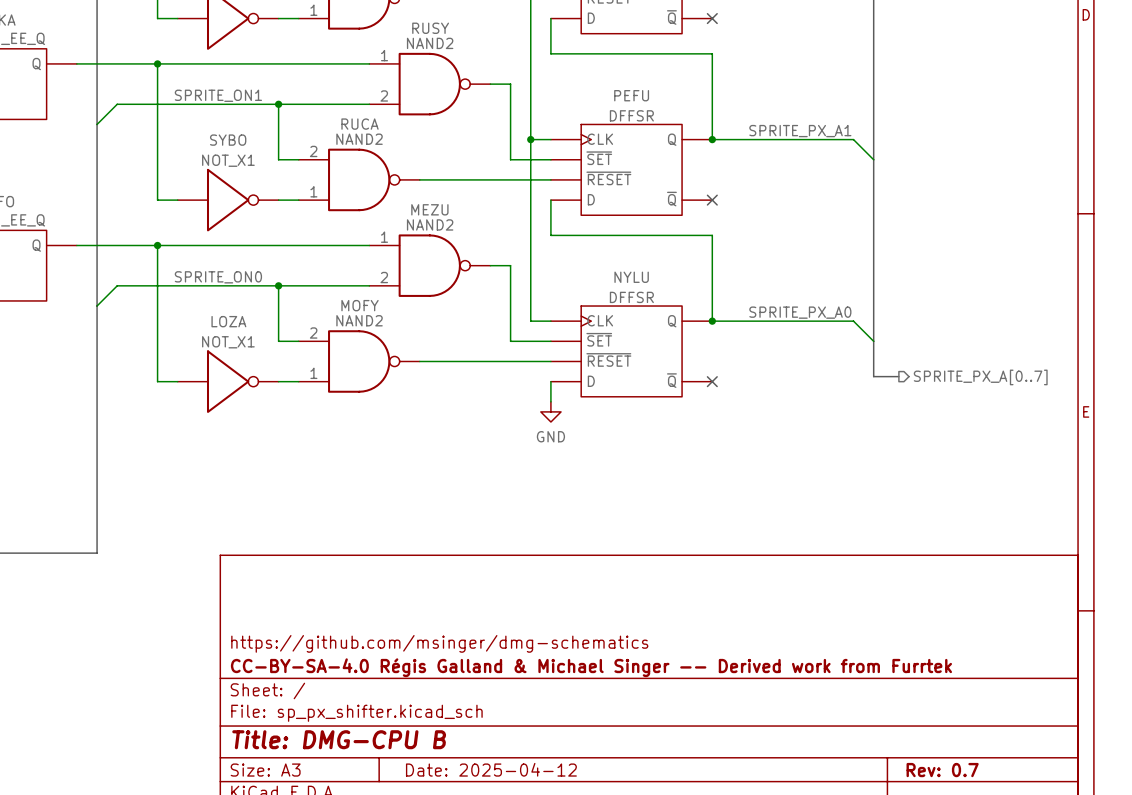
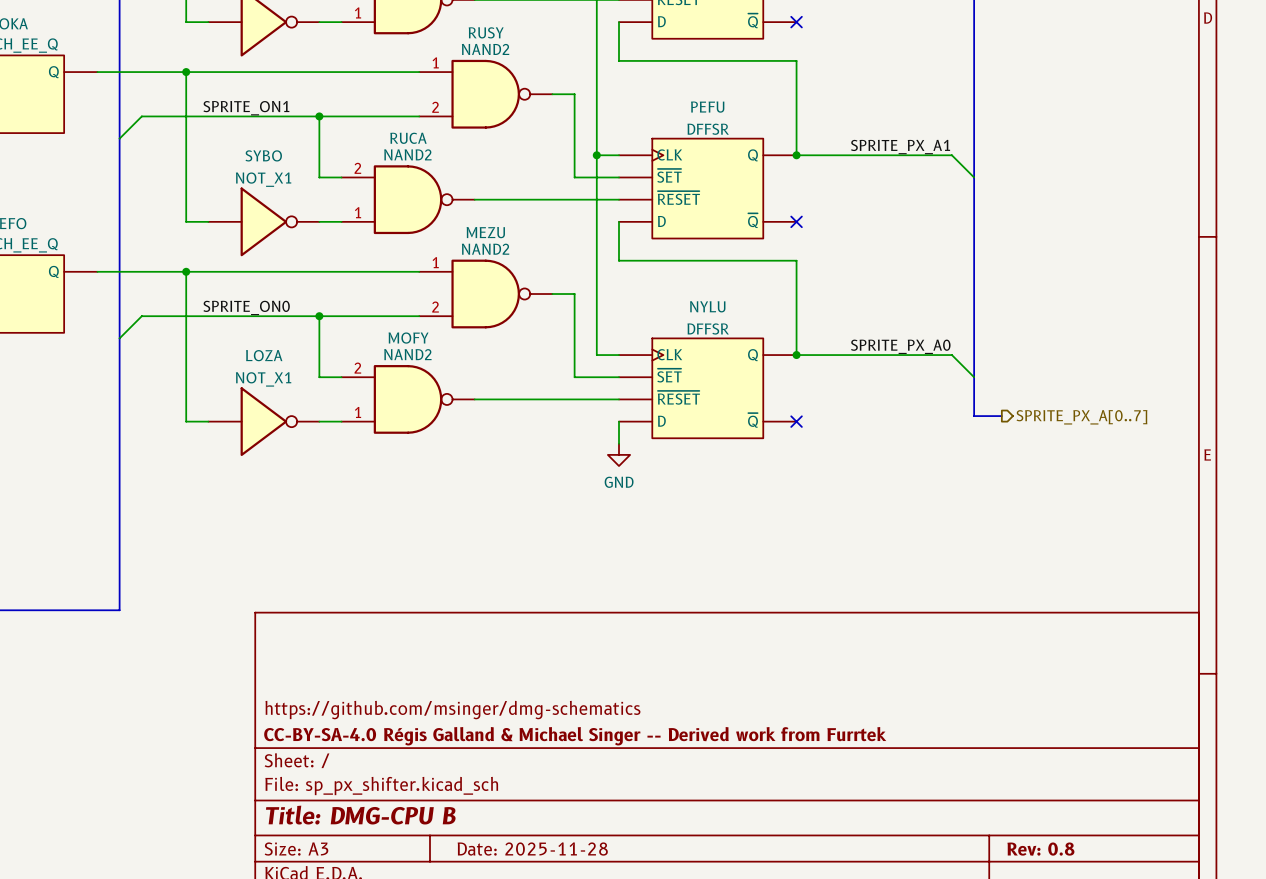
title block: Date: 2025-04-12 (491, 769) -> Date: 2025-11-28 (532, 849)
title block: Rev: 0.7 (942, 770) -> Rev: 0.8 (1040, 849)

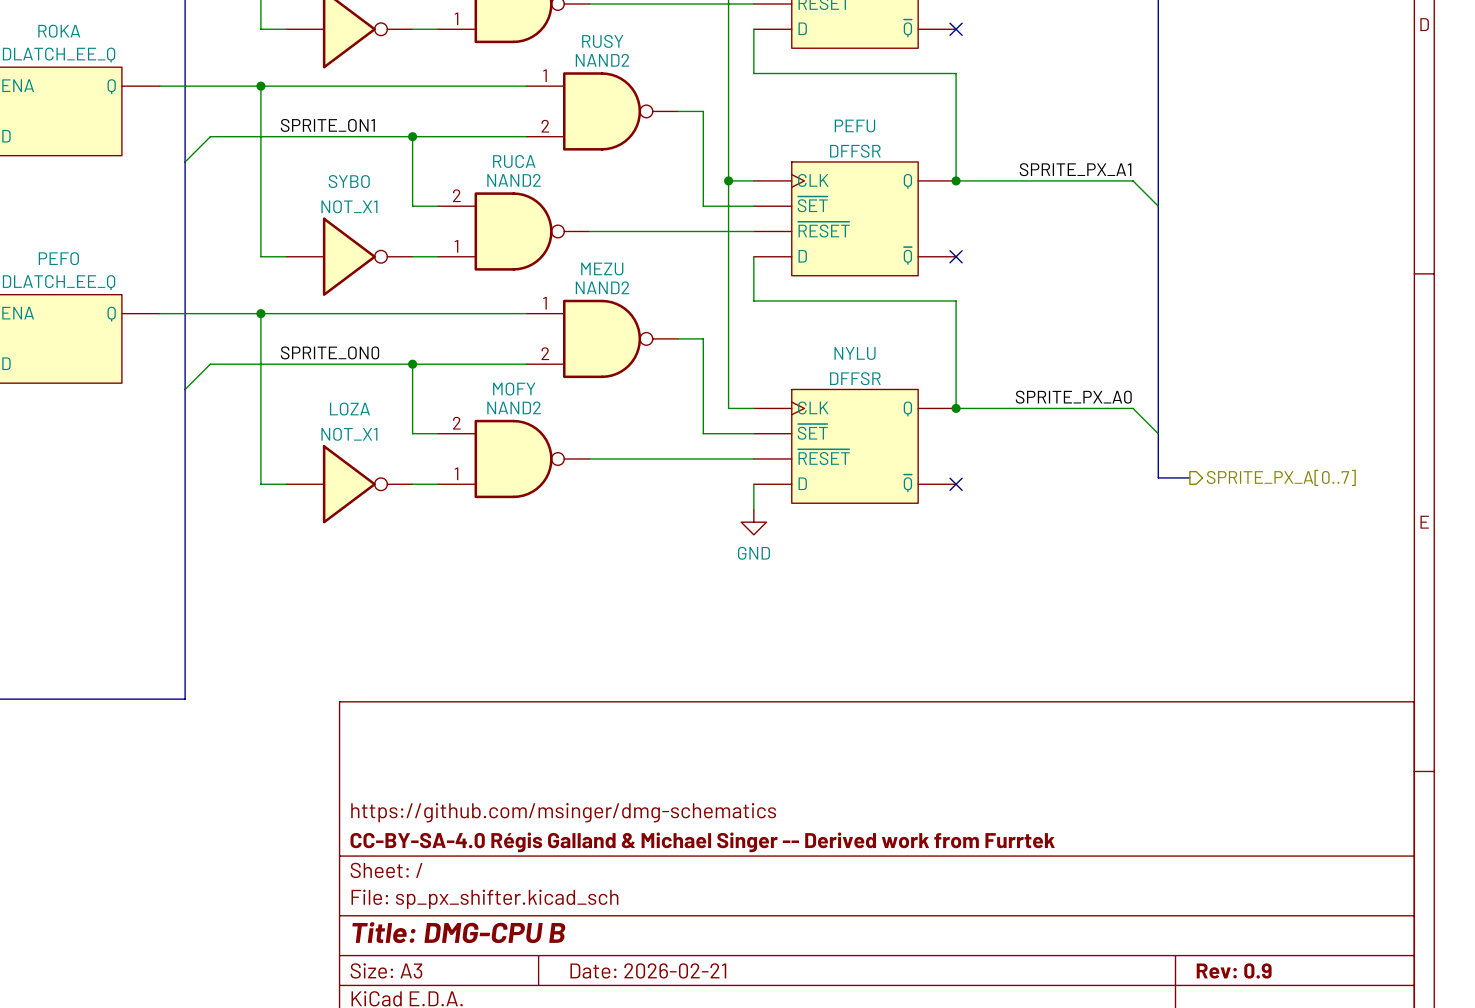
title block: Date: 2025-11-28 (532, 849) -> Date: 2026-02-21 (648, 970)
title block: Rev: 0.8 (1040, 849) -> Rev: 0.9 (1234, 970)

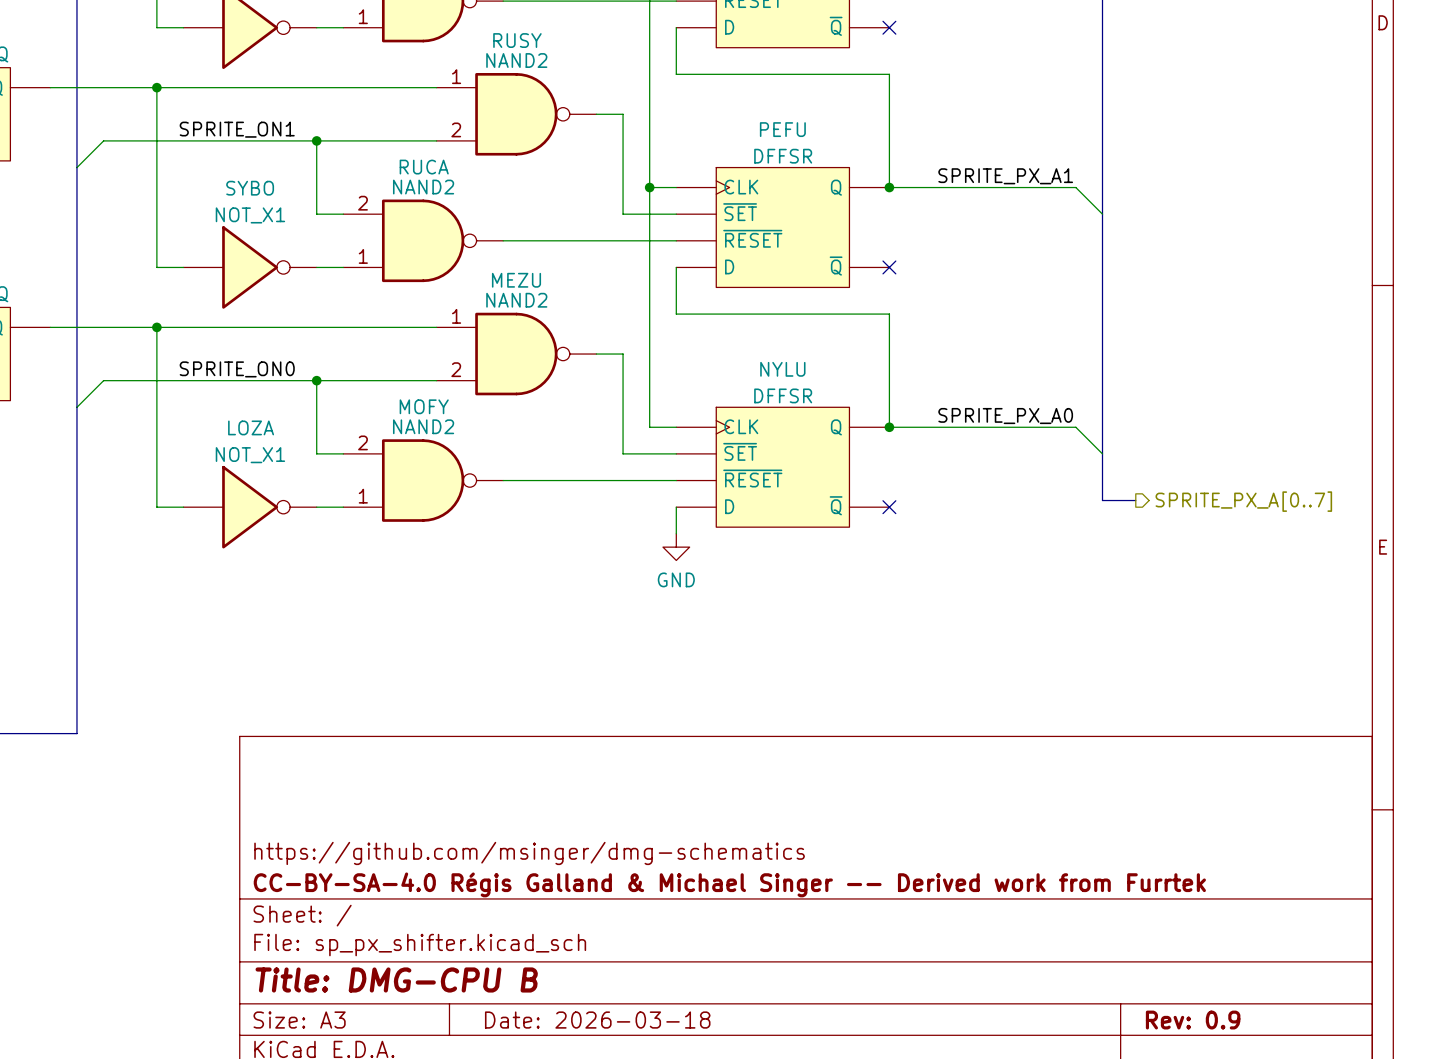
title block: Date: 2026-02-21 (648, 970) -> Date: 2026-03-18 (597, 1020)

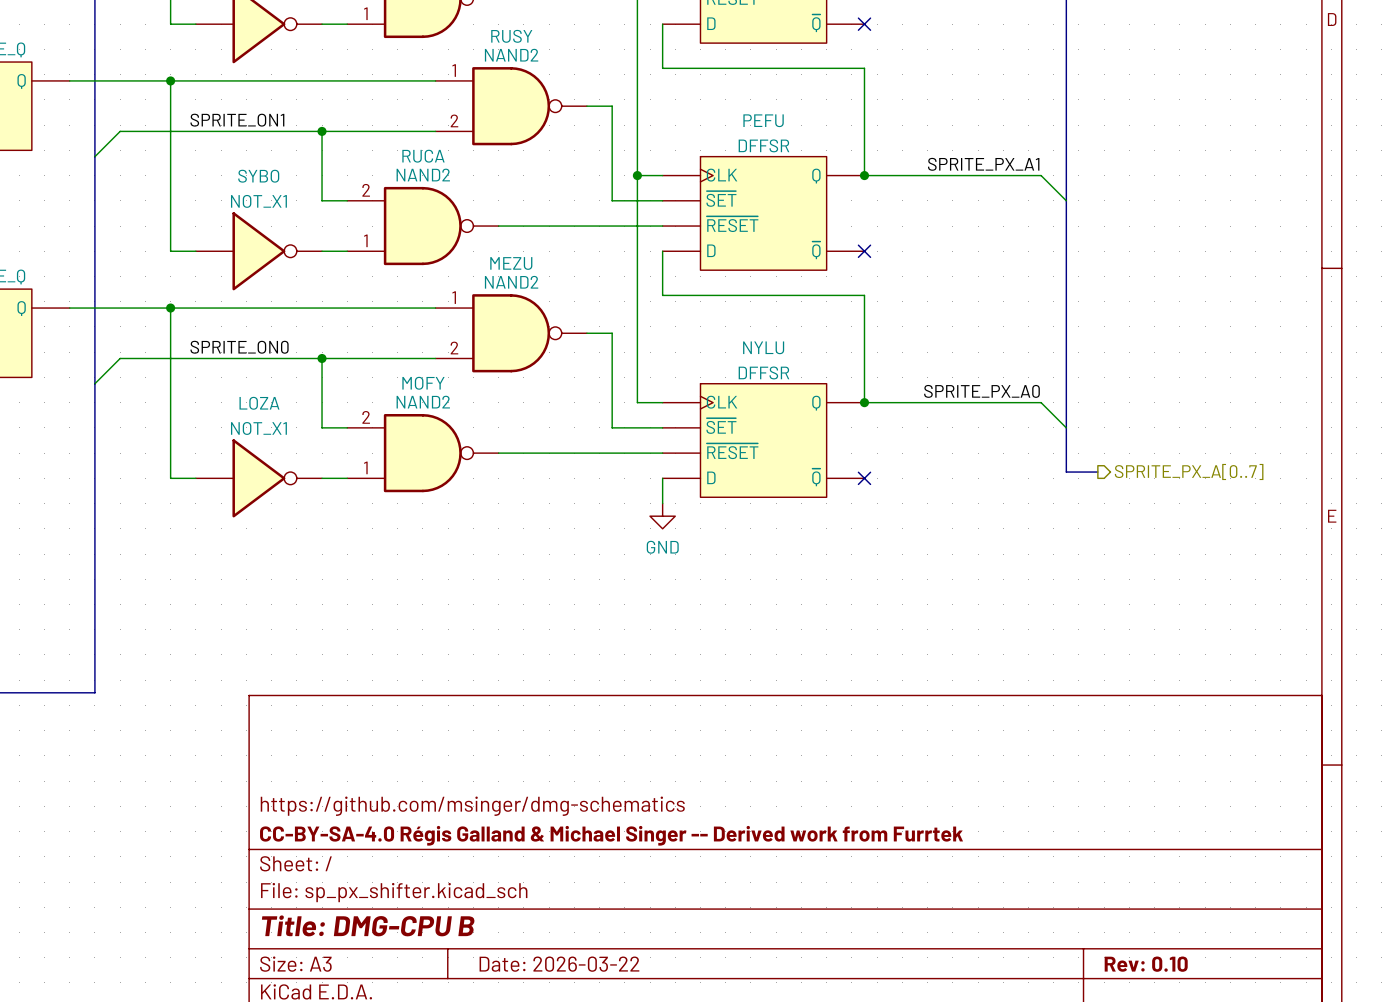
title block: Date: 2026-03-18 (597, 1020) -> Date: 2026-03-22 (559, 964)
title block: Rev: 0.9 (1193, 1020) -> Rev: 0.10 (1146, 964)

